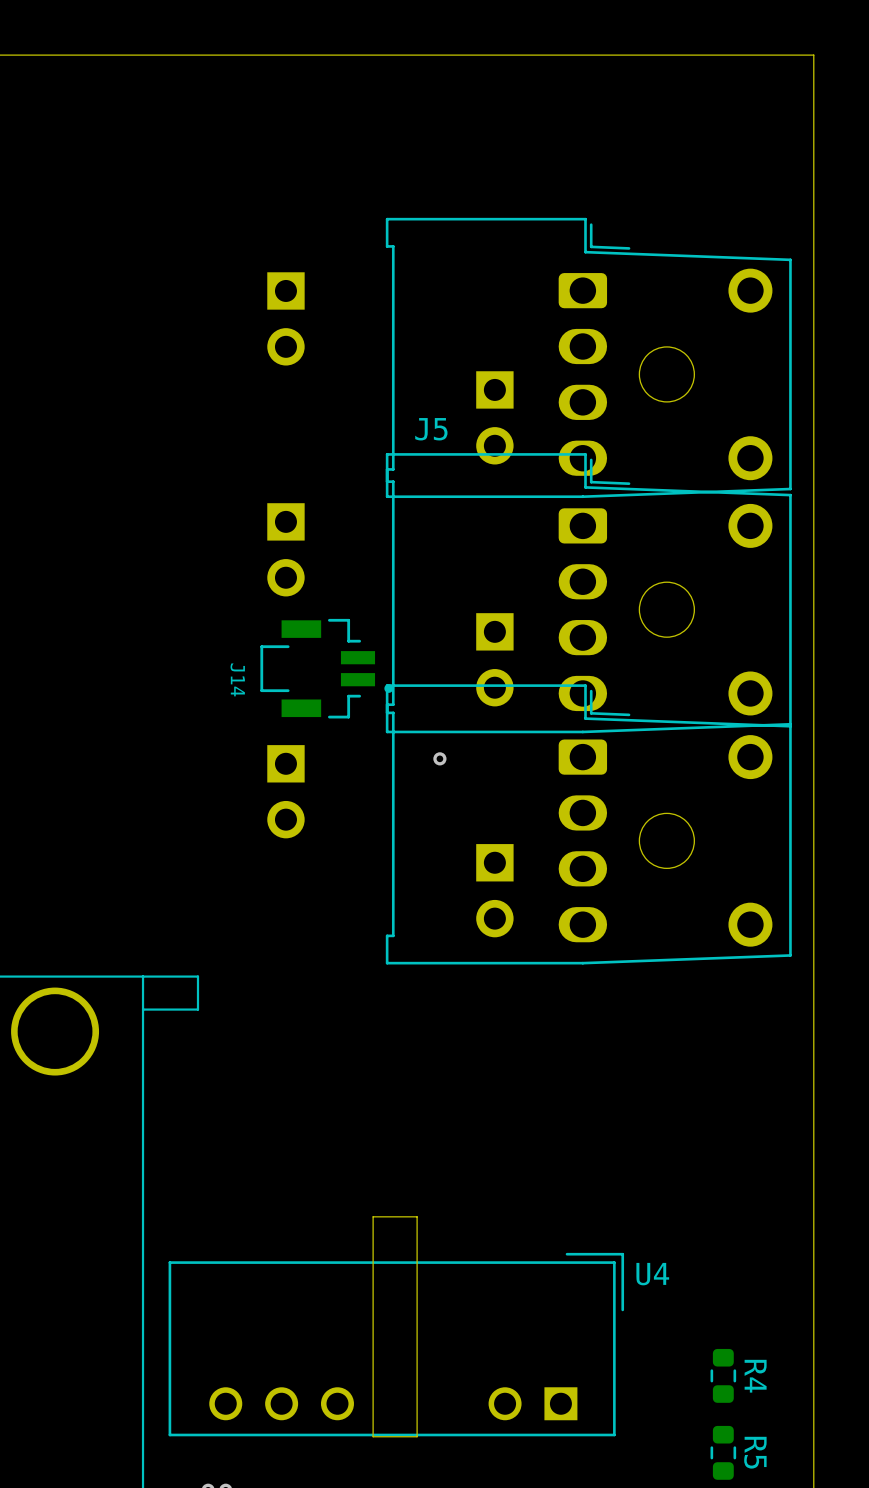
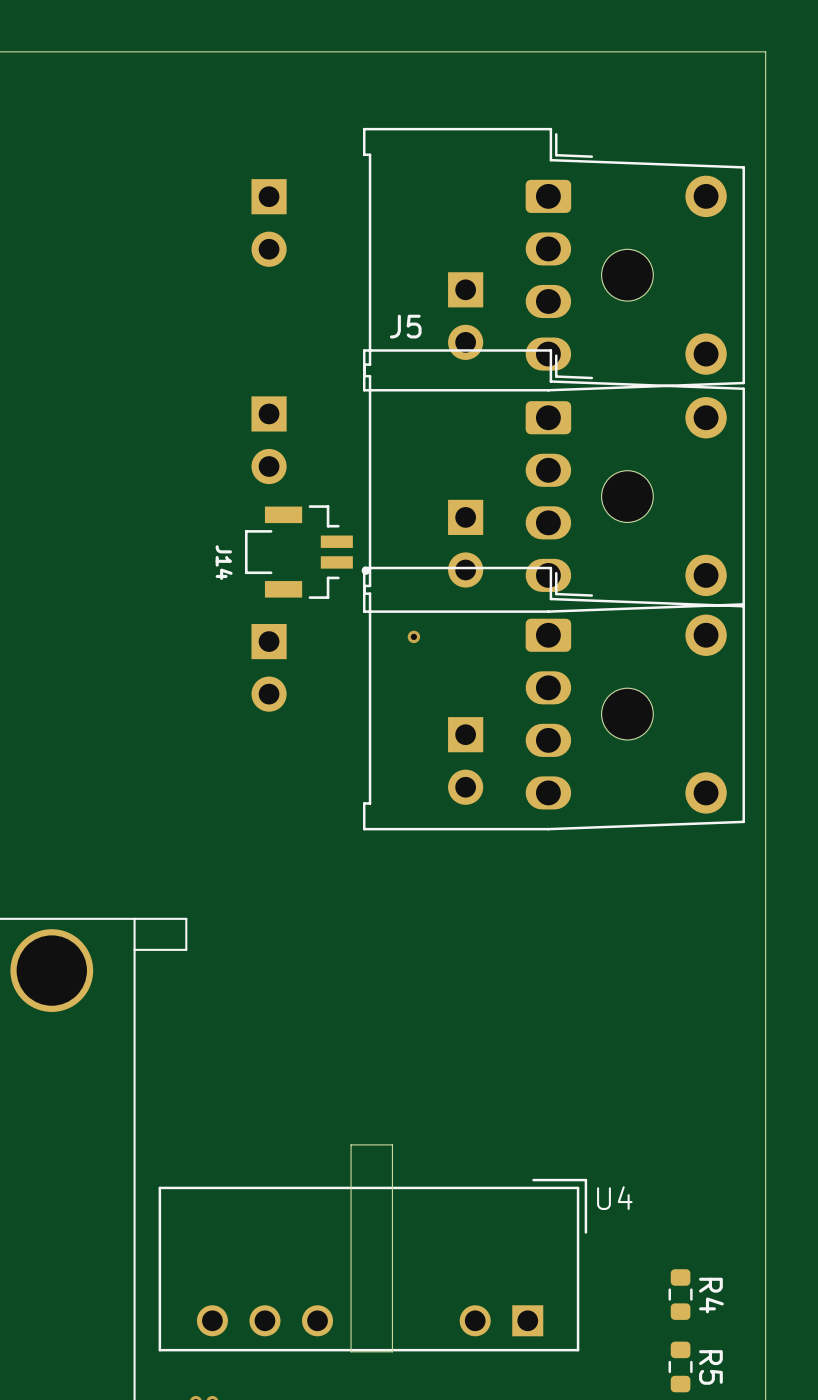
part: none -> (269, 222)
part: none -> (553, 259)
part: (285, 318) -> none
part: none -> (465, 316)
part: (588, 357) -> none
part: (494, 417) -> none
part: none -> (269, 440)
part: none -> (553, 481)
part: (285, 549) -> none
part: none -> (465, 543)
part: (588, 593) -> none
part: (494, 659) -> none
J14 position: (326, 668) -> (307, 552)
part: none -> (269, 667)
via position: (439, 758) -> (413, 636)
part: (285, 791) -> none
part: none -> (465, 760)
J5 position: (588, 824) -> (553, 698)
part: (494, 890) -> none

